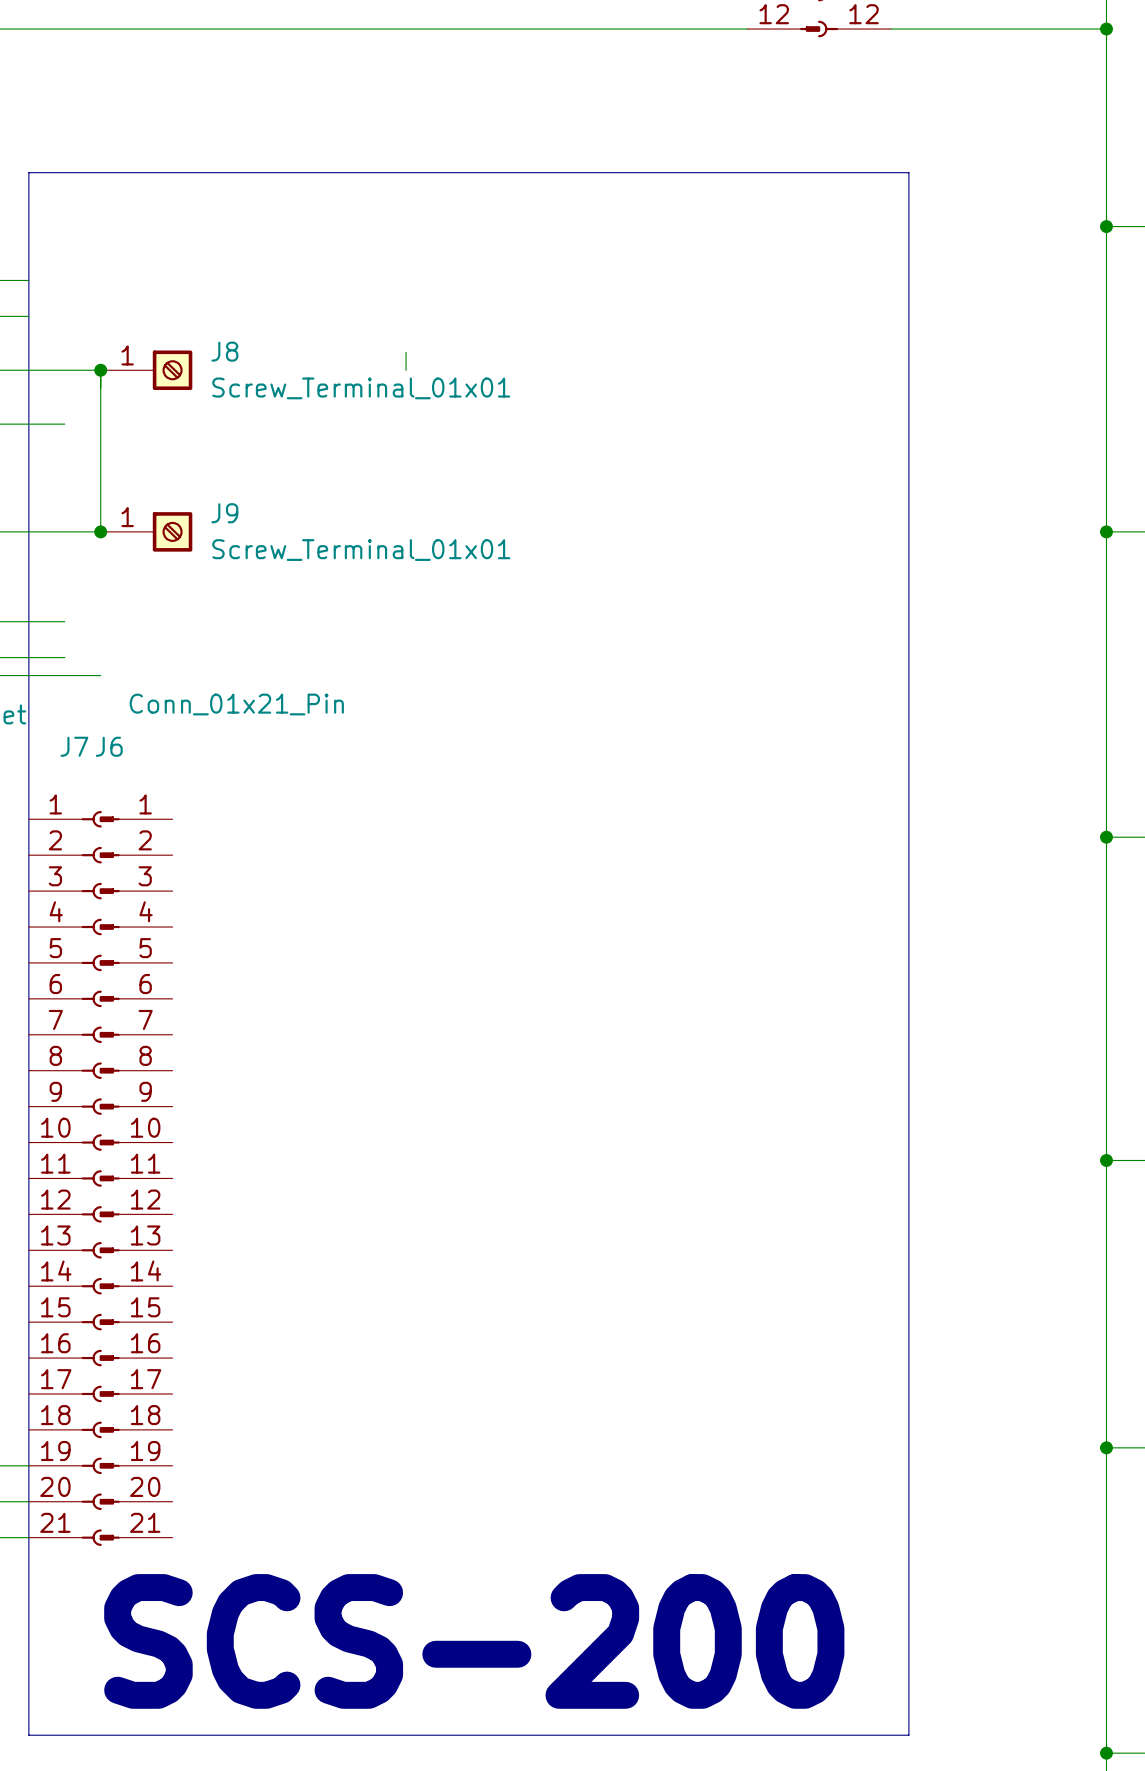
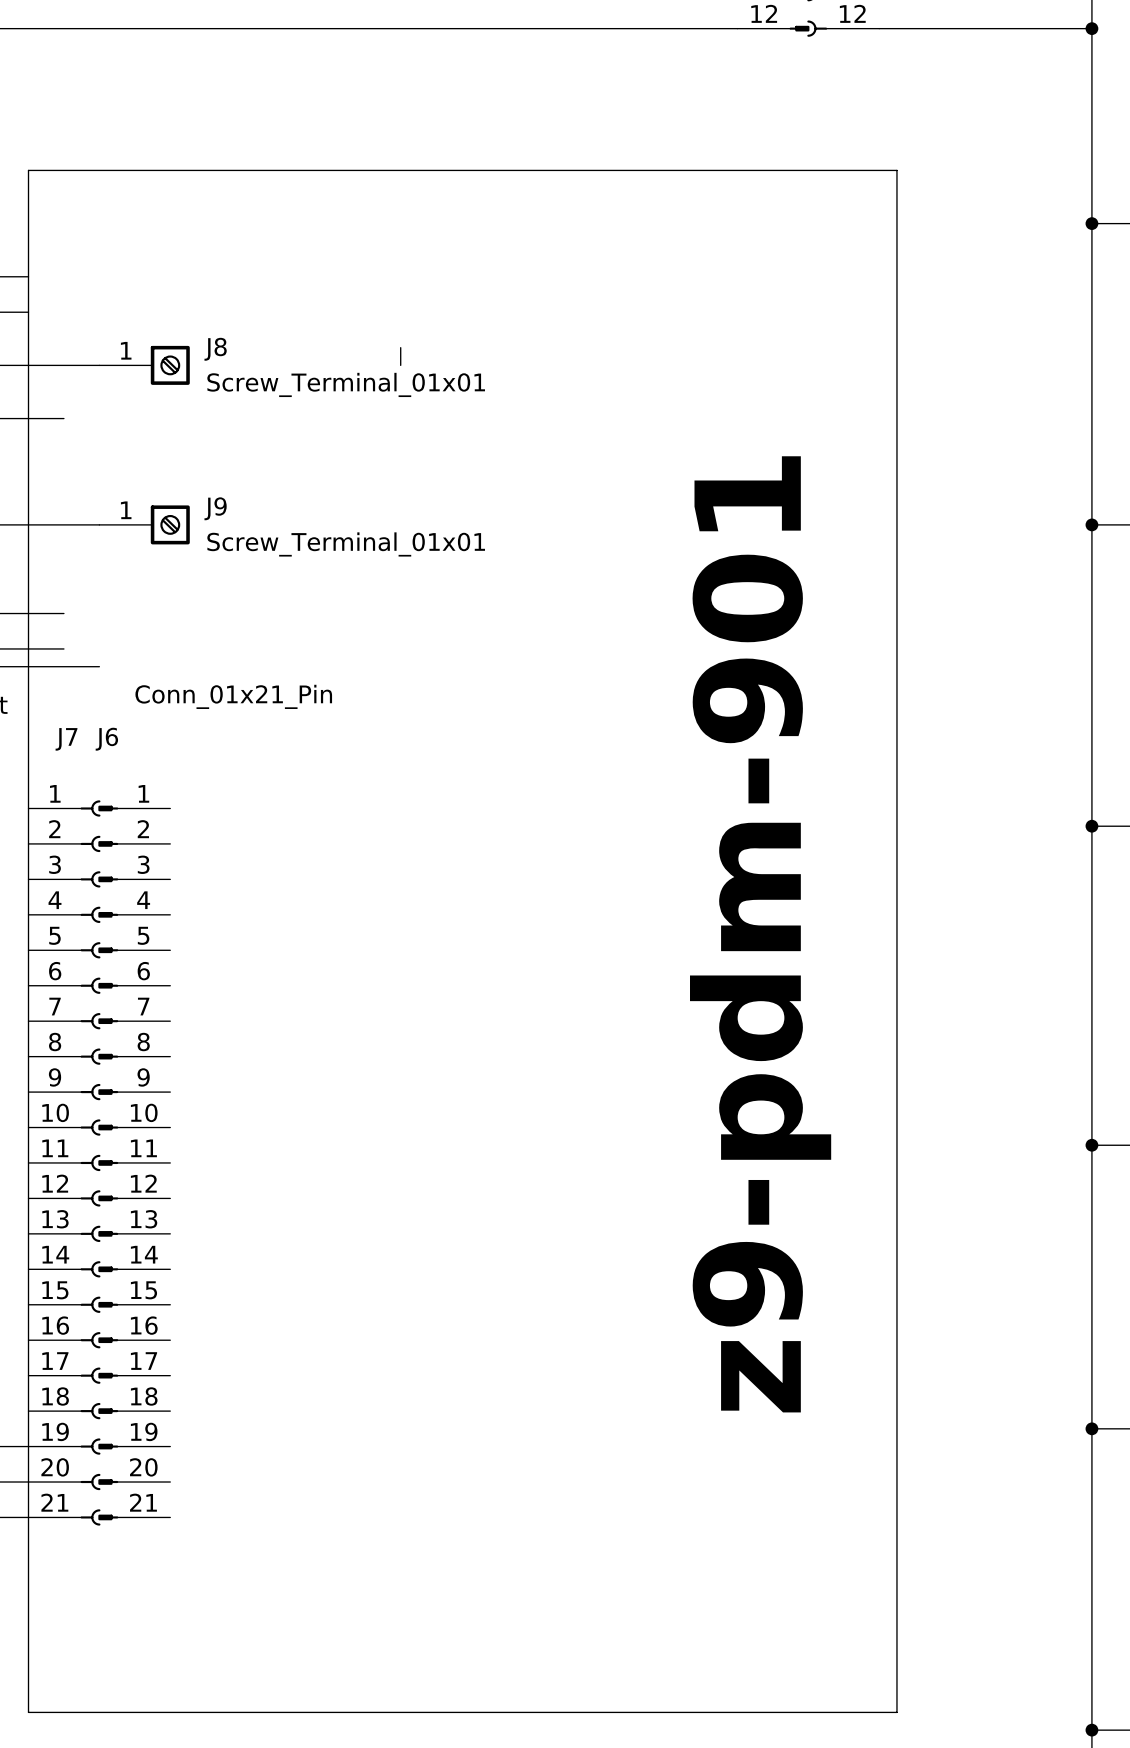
wire: (100, 370) (100, 531) -> none
junction: (100, 370) -> none
junction: (100, 531) -> none
text: none -> z9-pdm-901 (760, 934)
text: SCS-200 (474, 1641) -> none

